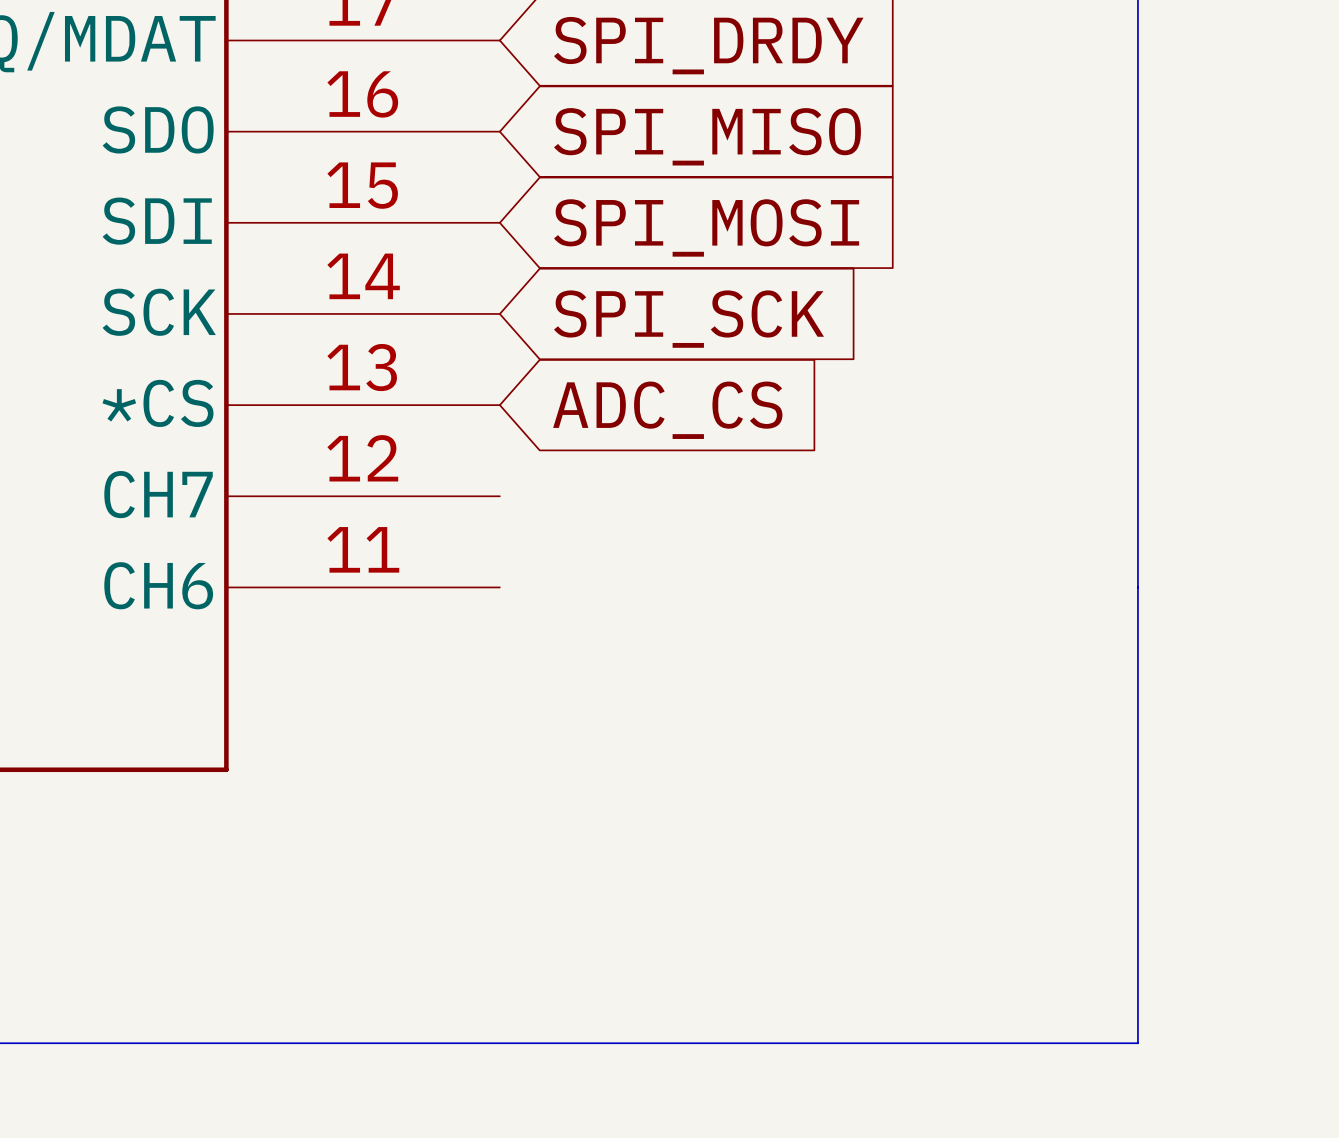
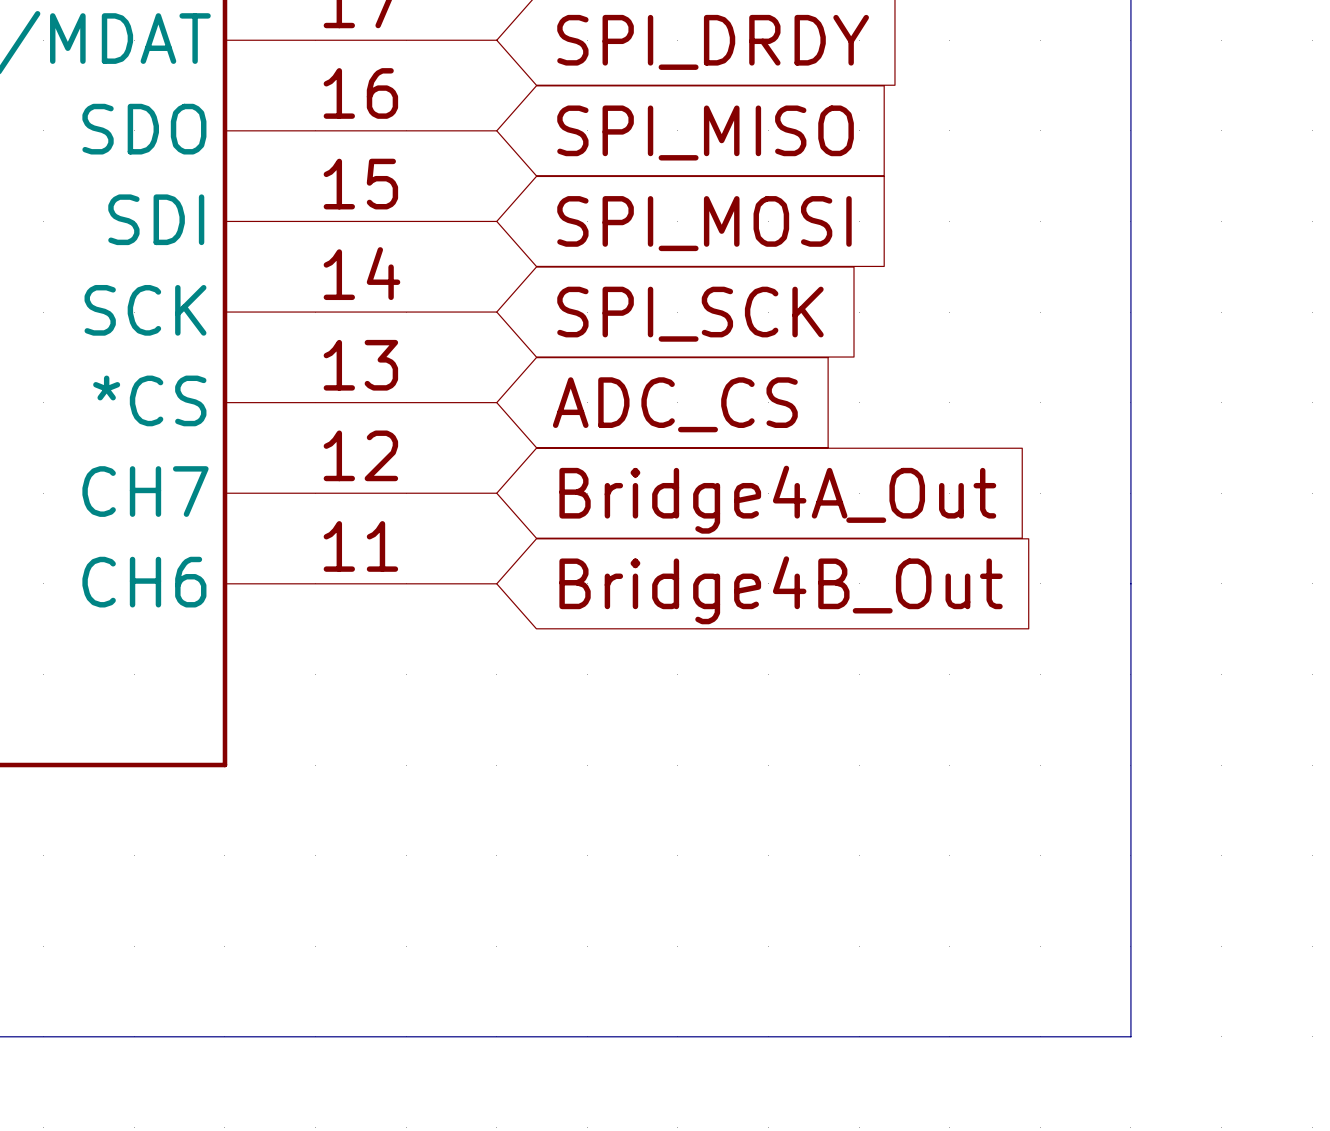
global label: none -> Bridge4A_Out (777, 499)
global label: none -> Bridge4B_Out (781, 590)

